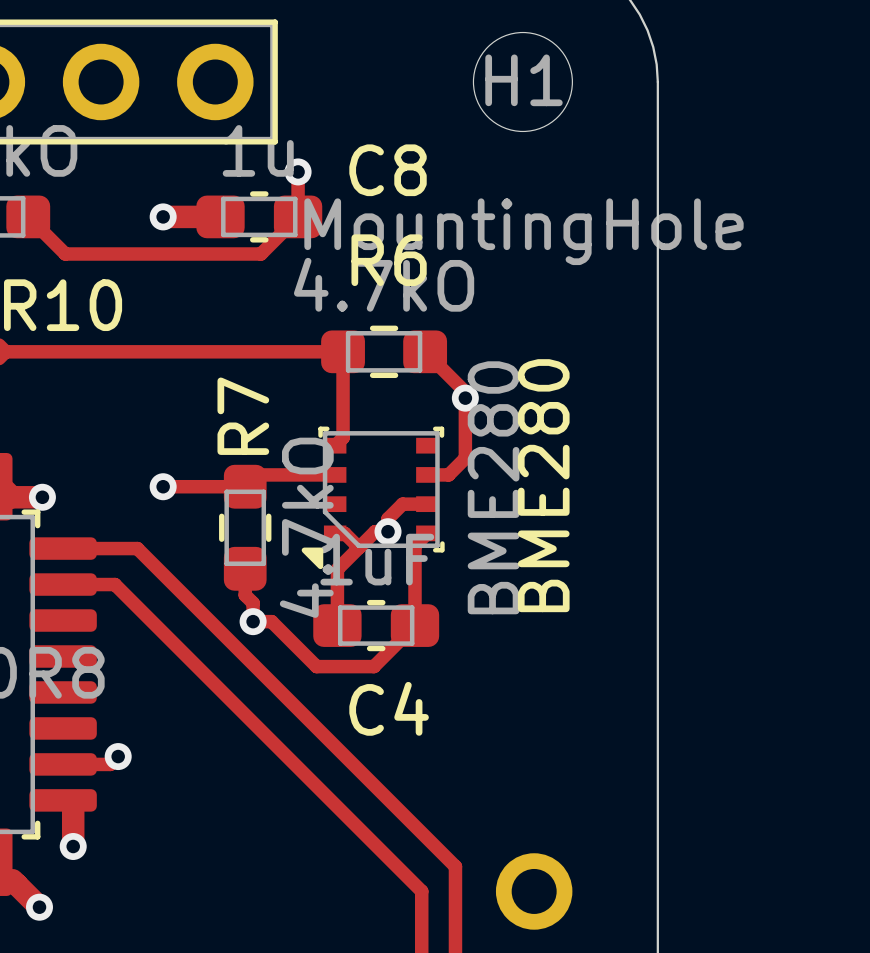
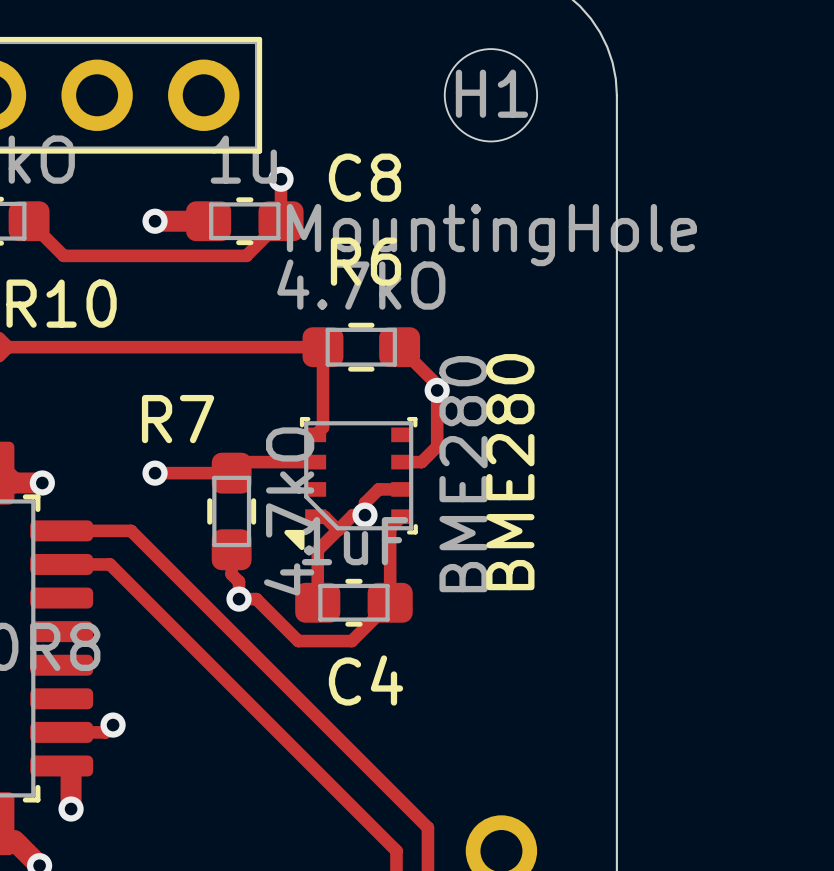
R7 name rotation: 0° (243, 416) -> 90° clockwise (178, 419)

